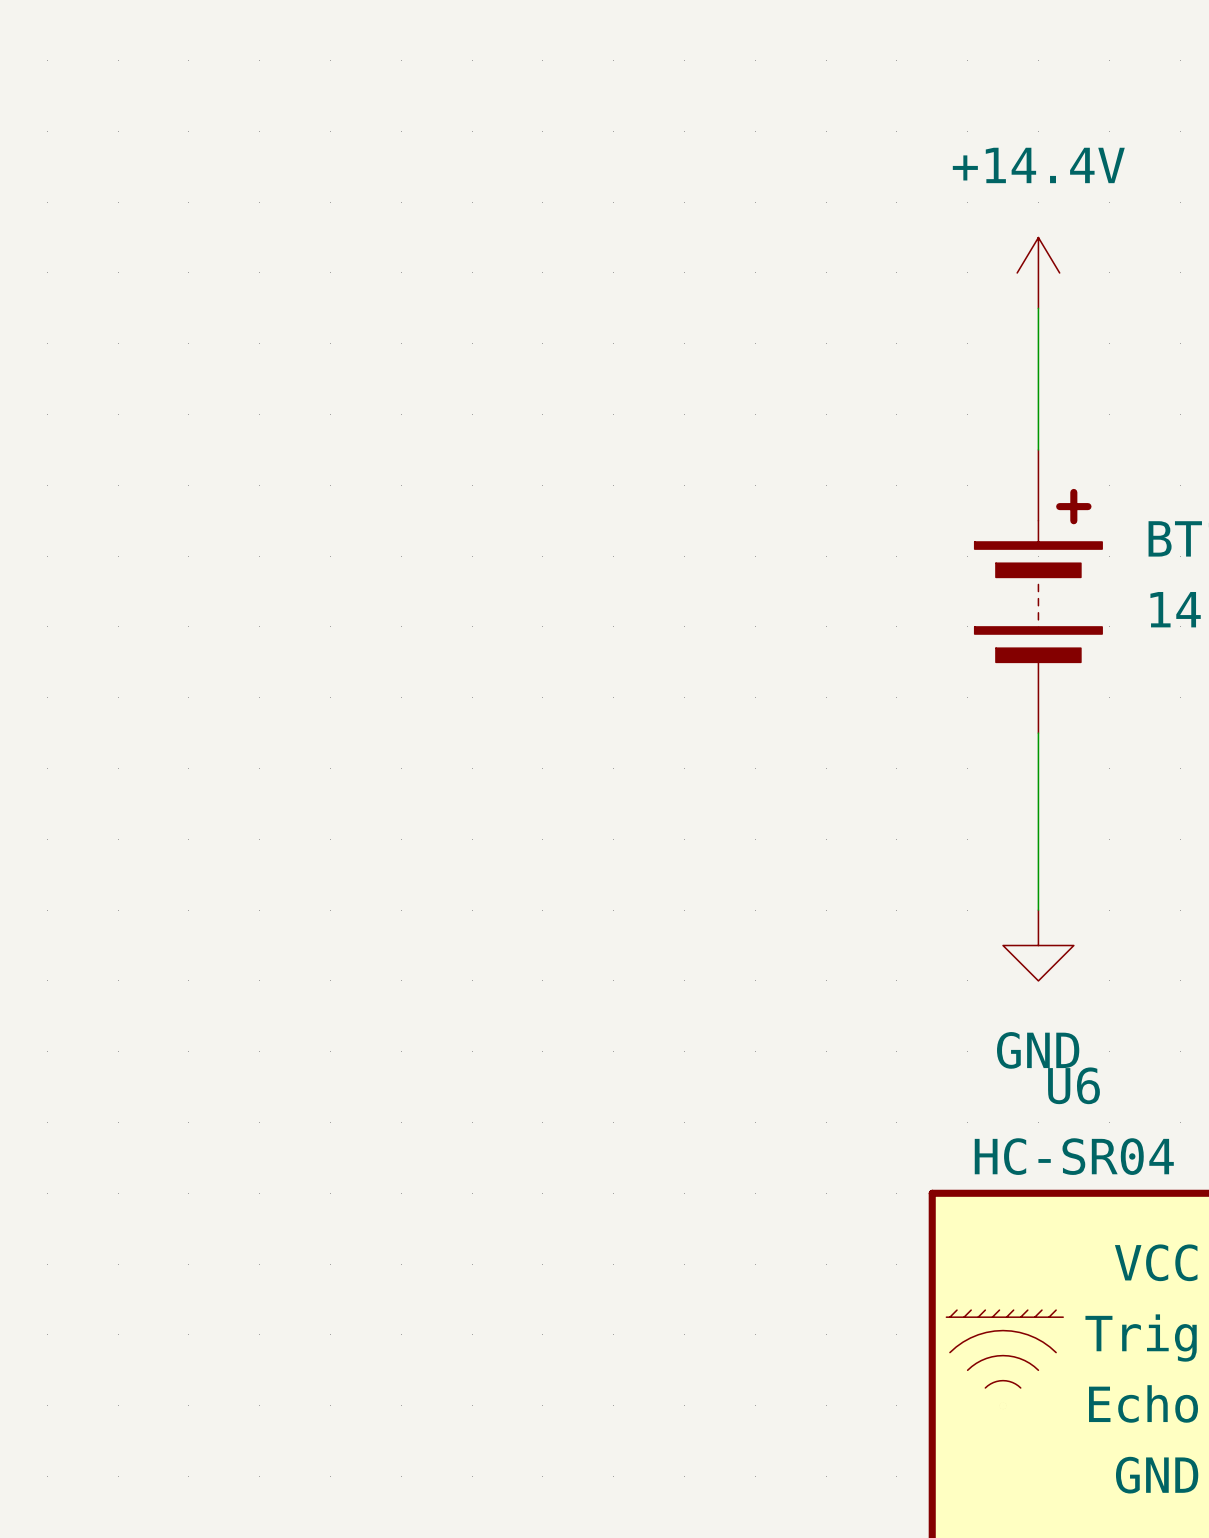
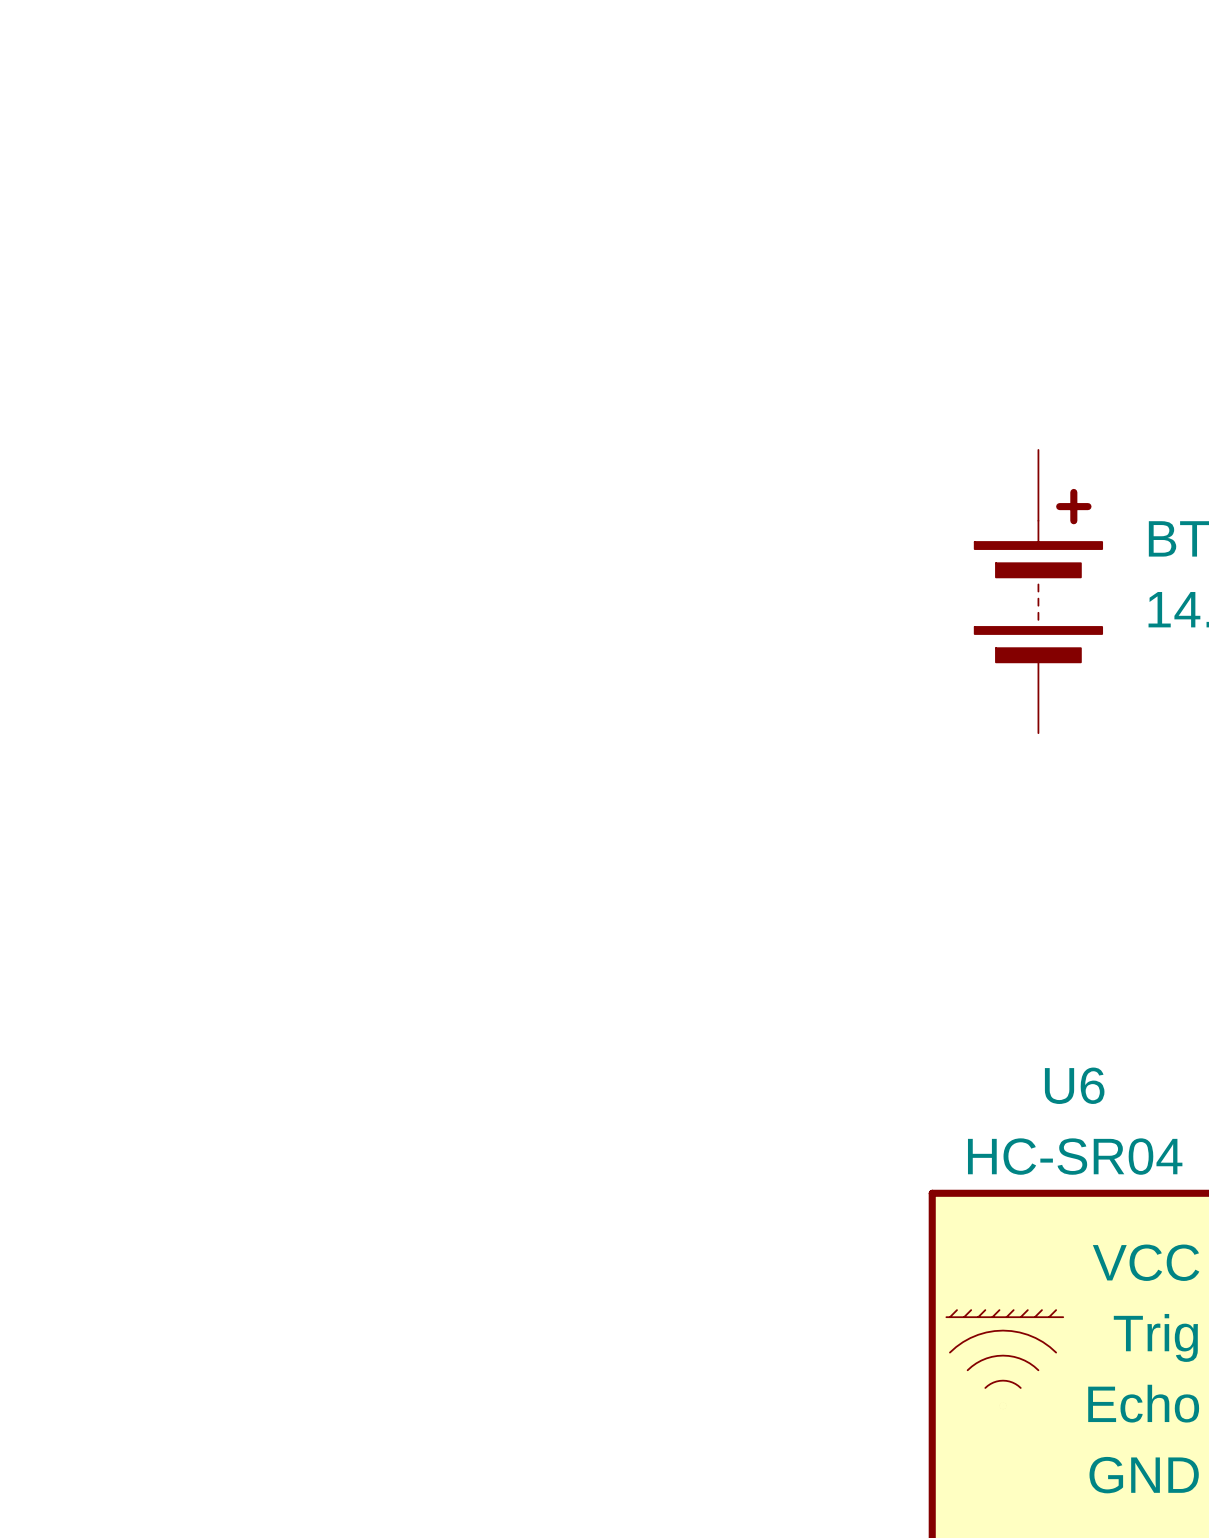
power symbol: +14.4V (1038, 272) -> none
wire: (1038, 308) (1038, 449) -> none
wire: (1038, 733) (1038, 910) -> none
power symbol: GND (1038, 945) -> none

